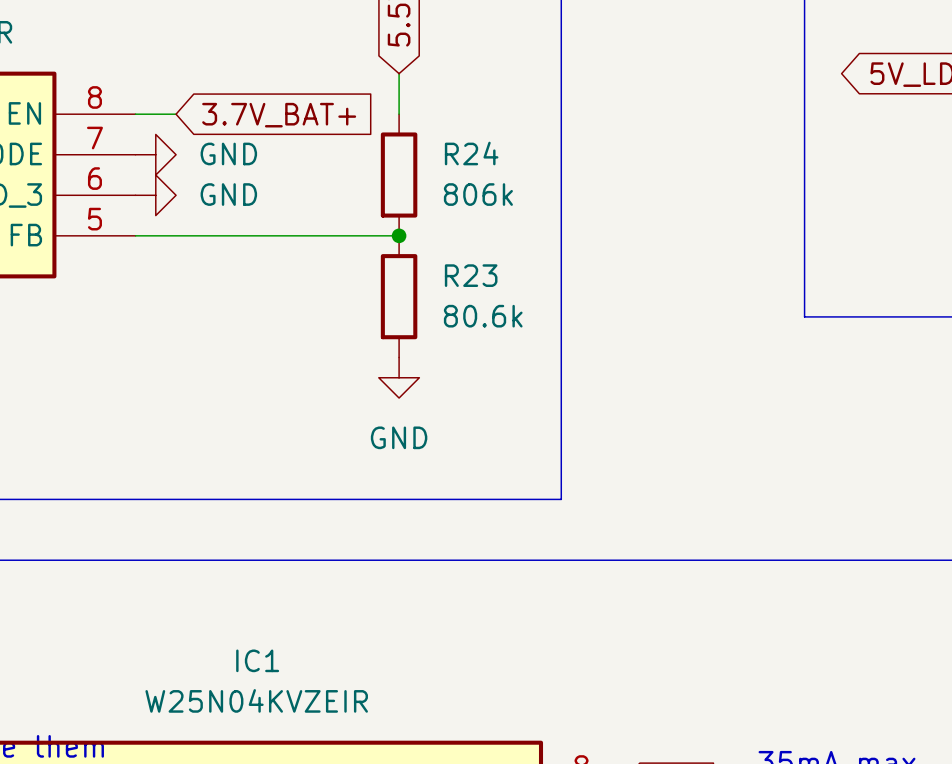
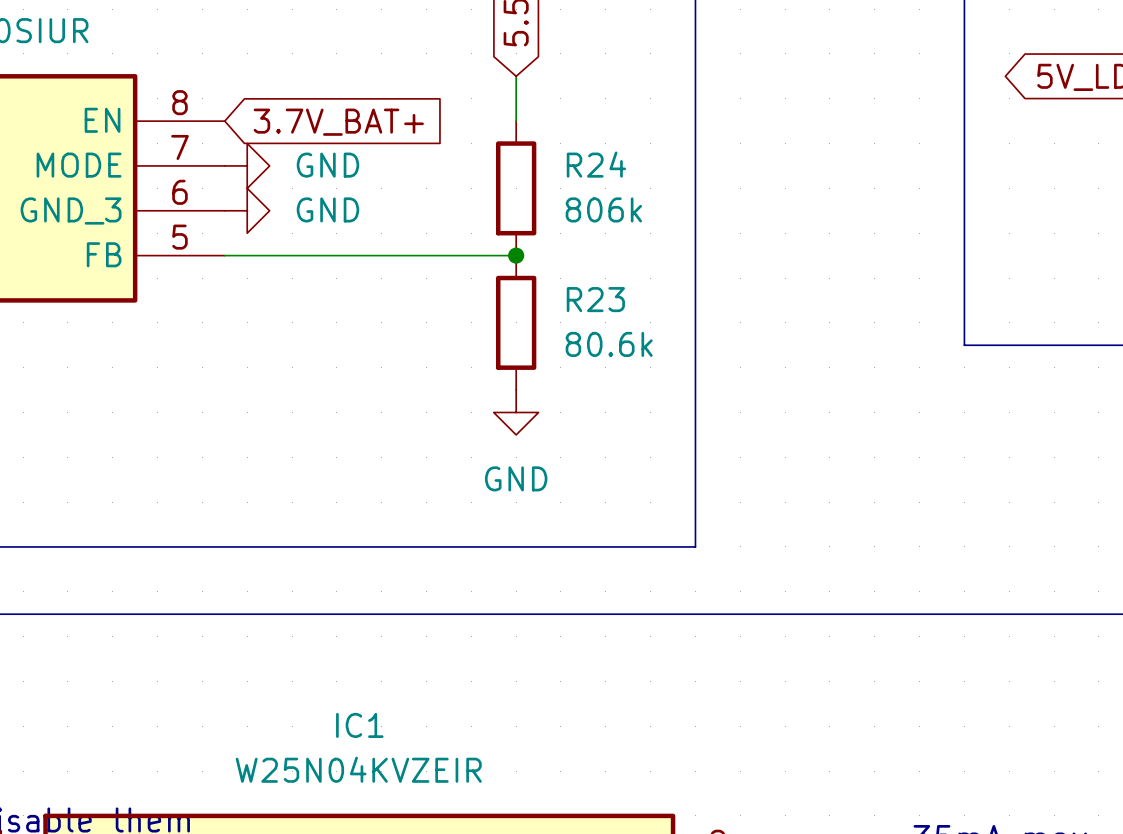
wire: (135, 114) (176, 114) -> none
global label position: 3.7V_BAT+ (279, 115) -> 3.7V_BAT+ (338, 122)

